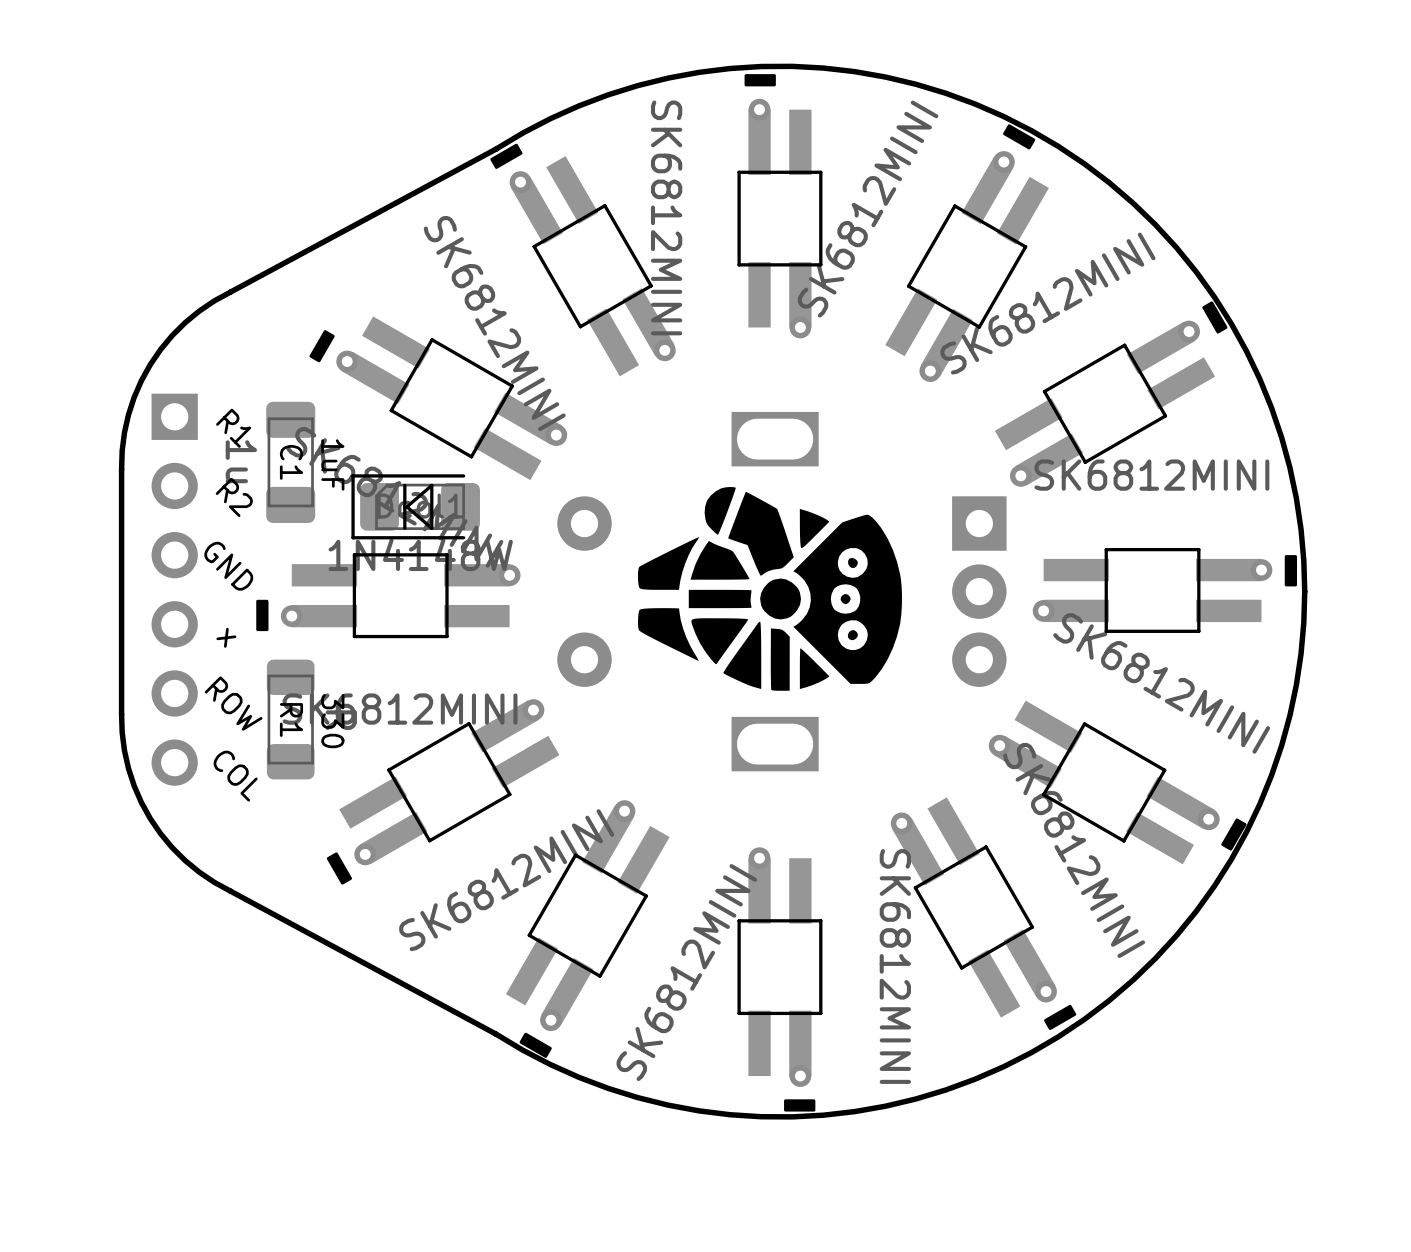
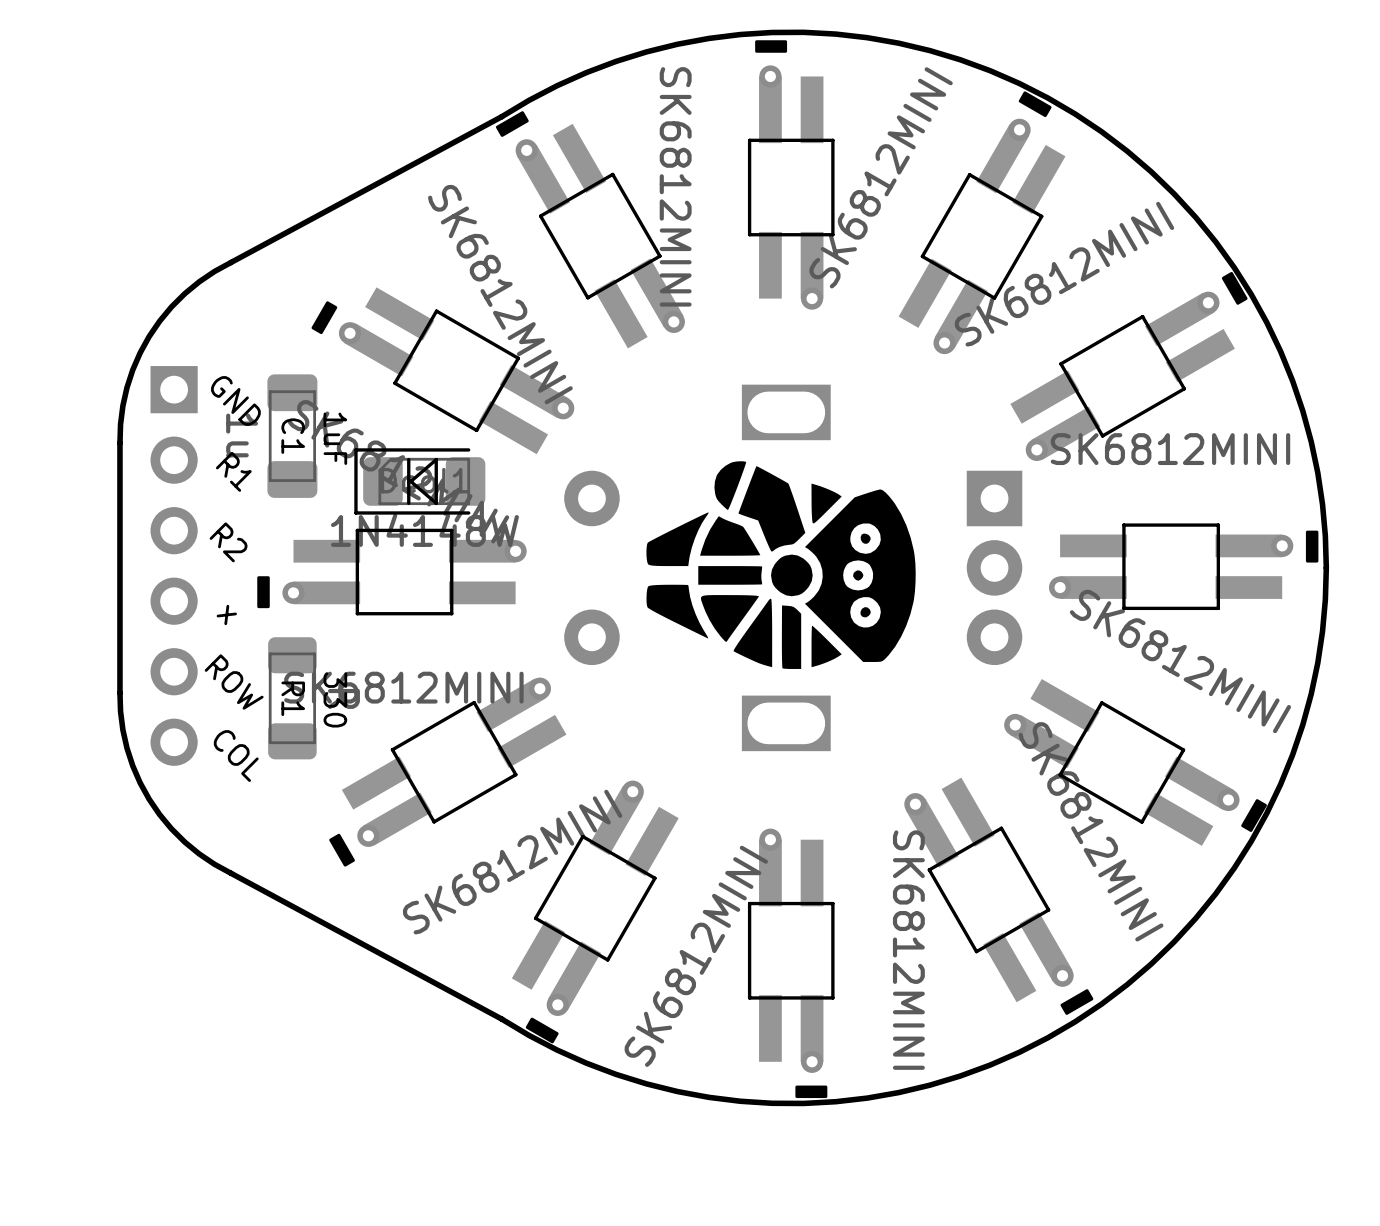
text: R1 (233, 428) -> GND (235, 400)
text: R2 (234, 497) -> R1 (233, 471)
text: GND (228, 566) -> R2 (228, 542)

